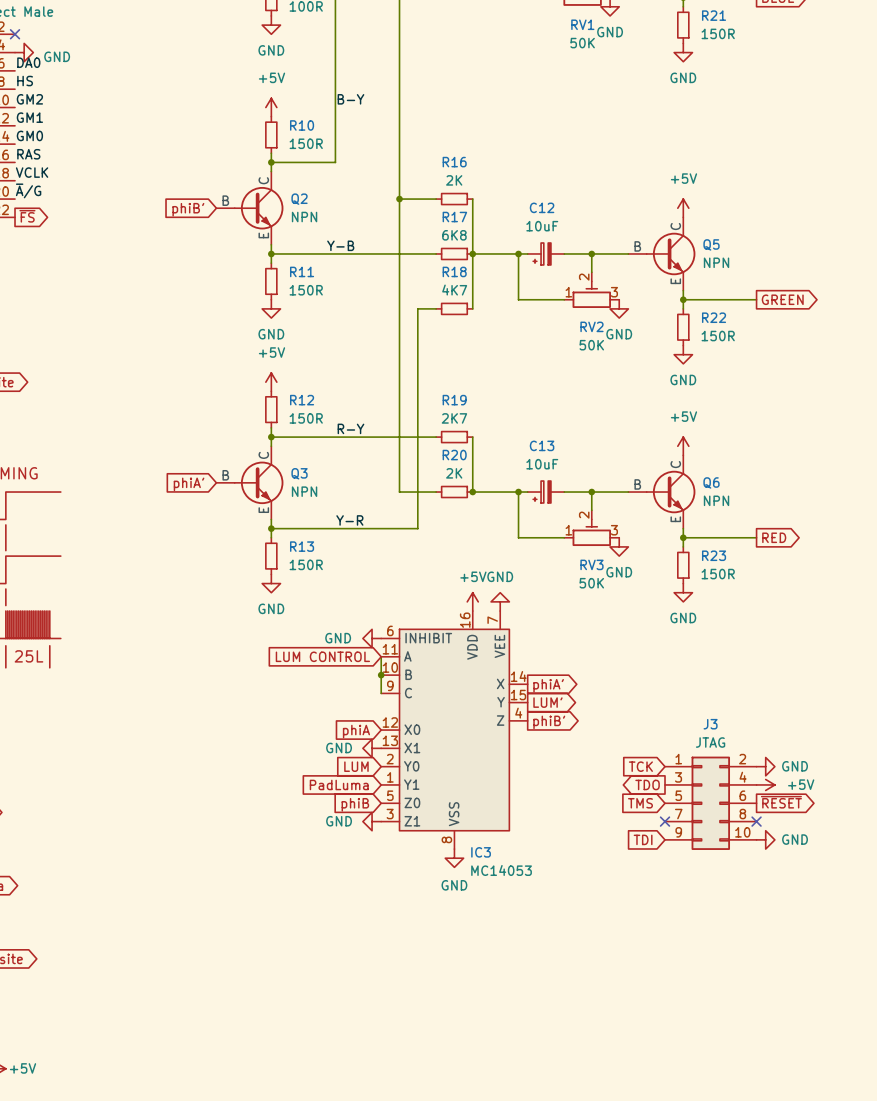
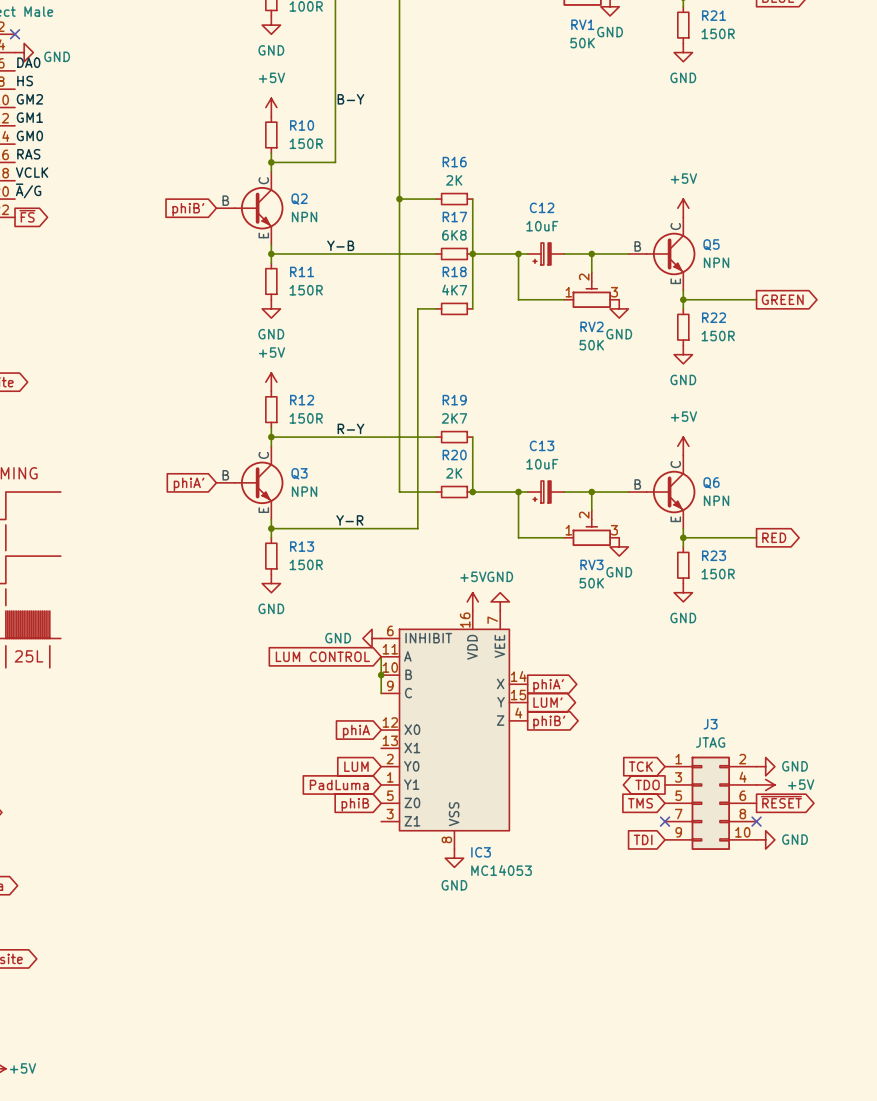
power symbol: GND (372, 748) -> none
power symbol: GND (372, 821) -> none

